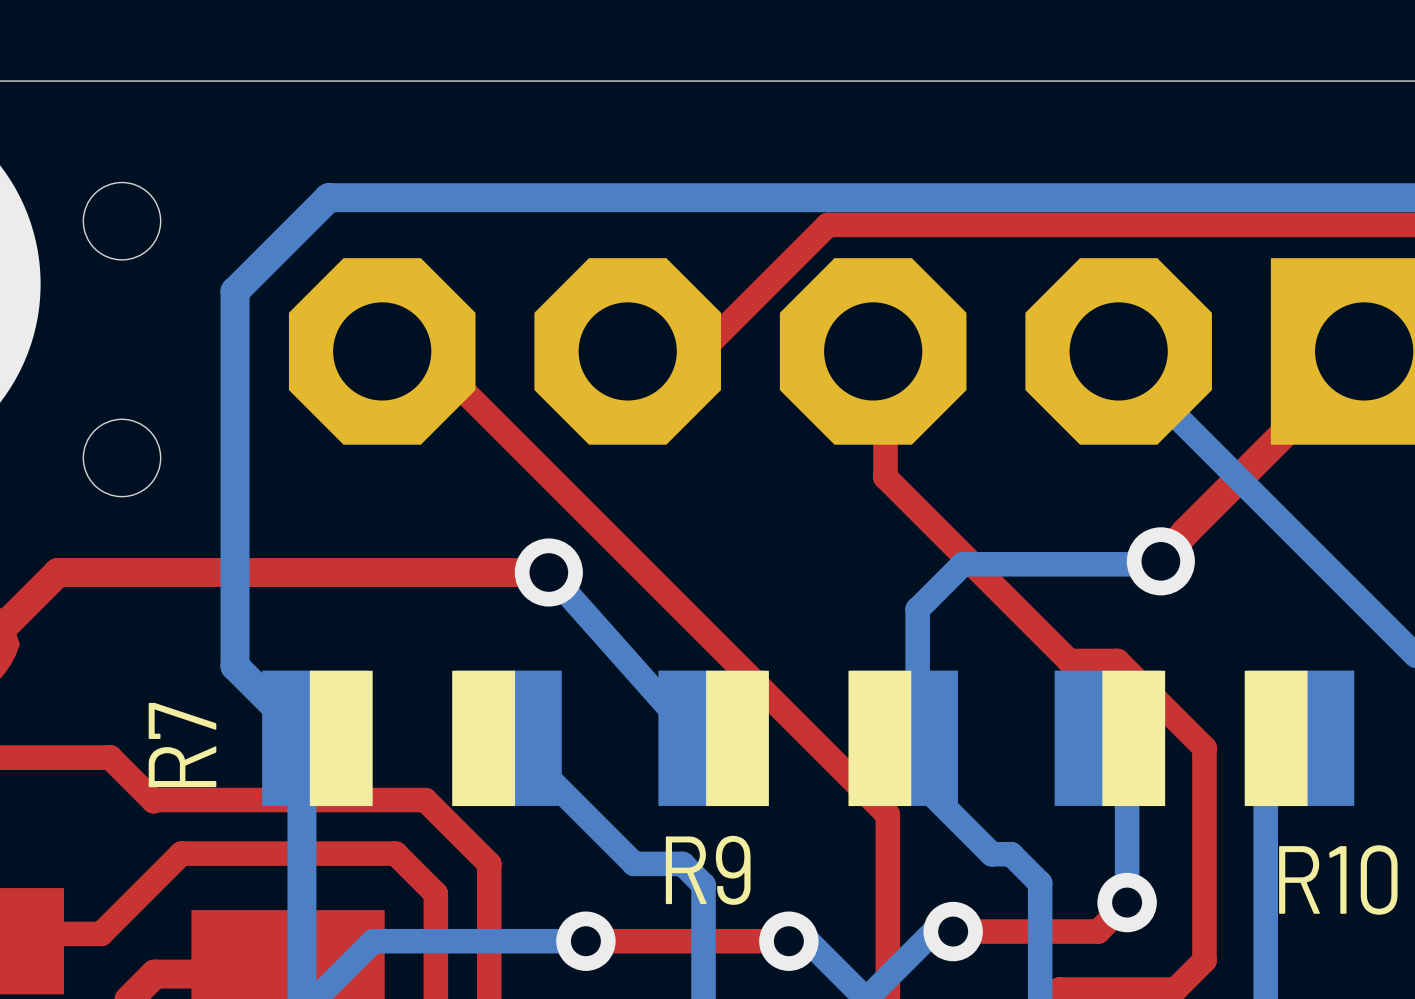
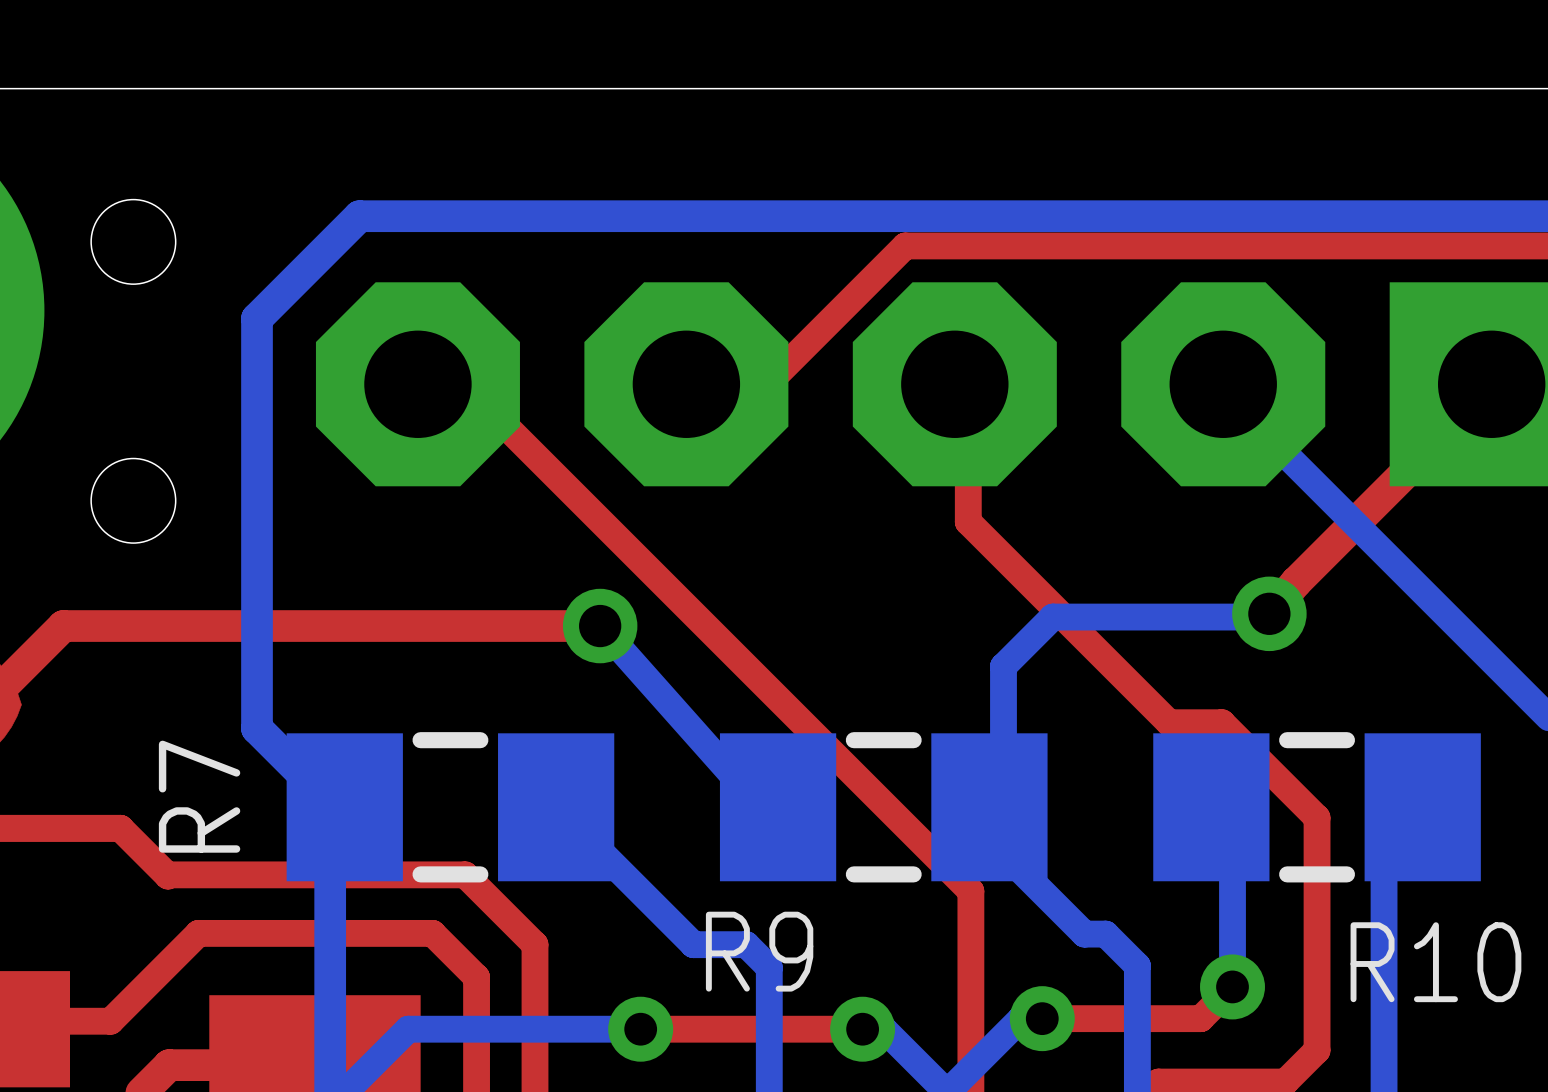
R7 footprint: [262, 670, 562, 807] -> [286, 732, 615, 883]
R9 footprint: [658, 670, 958, 807] -> [719, 732, 1048, 883]
R10 footprint: [1054, 670, 1355, 807] -> [1153, 732, 1481, 883]

